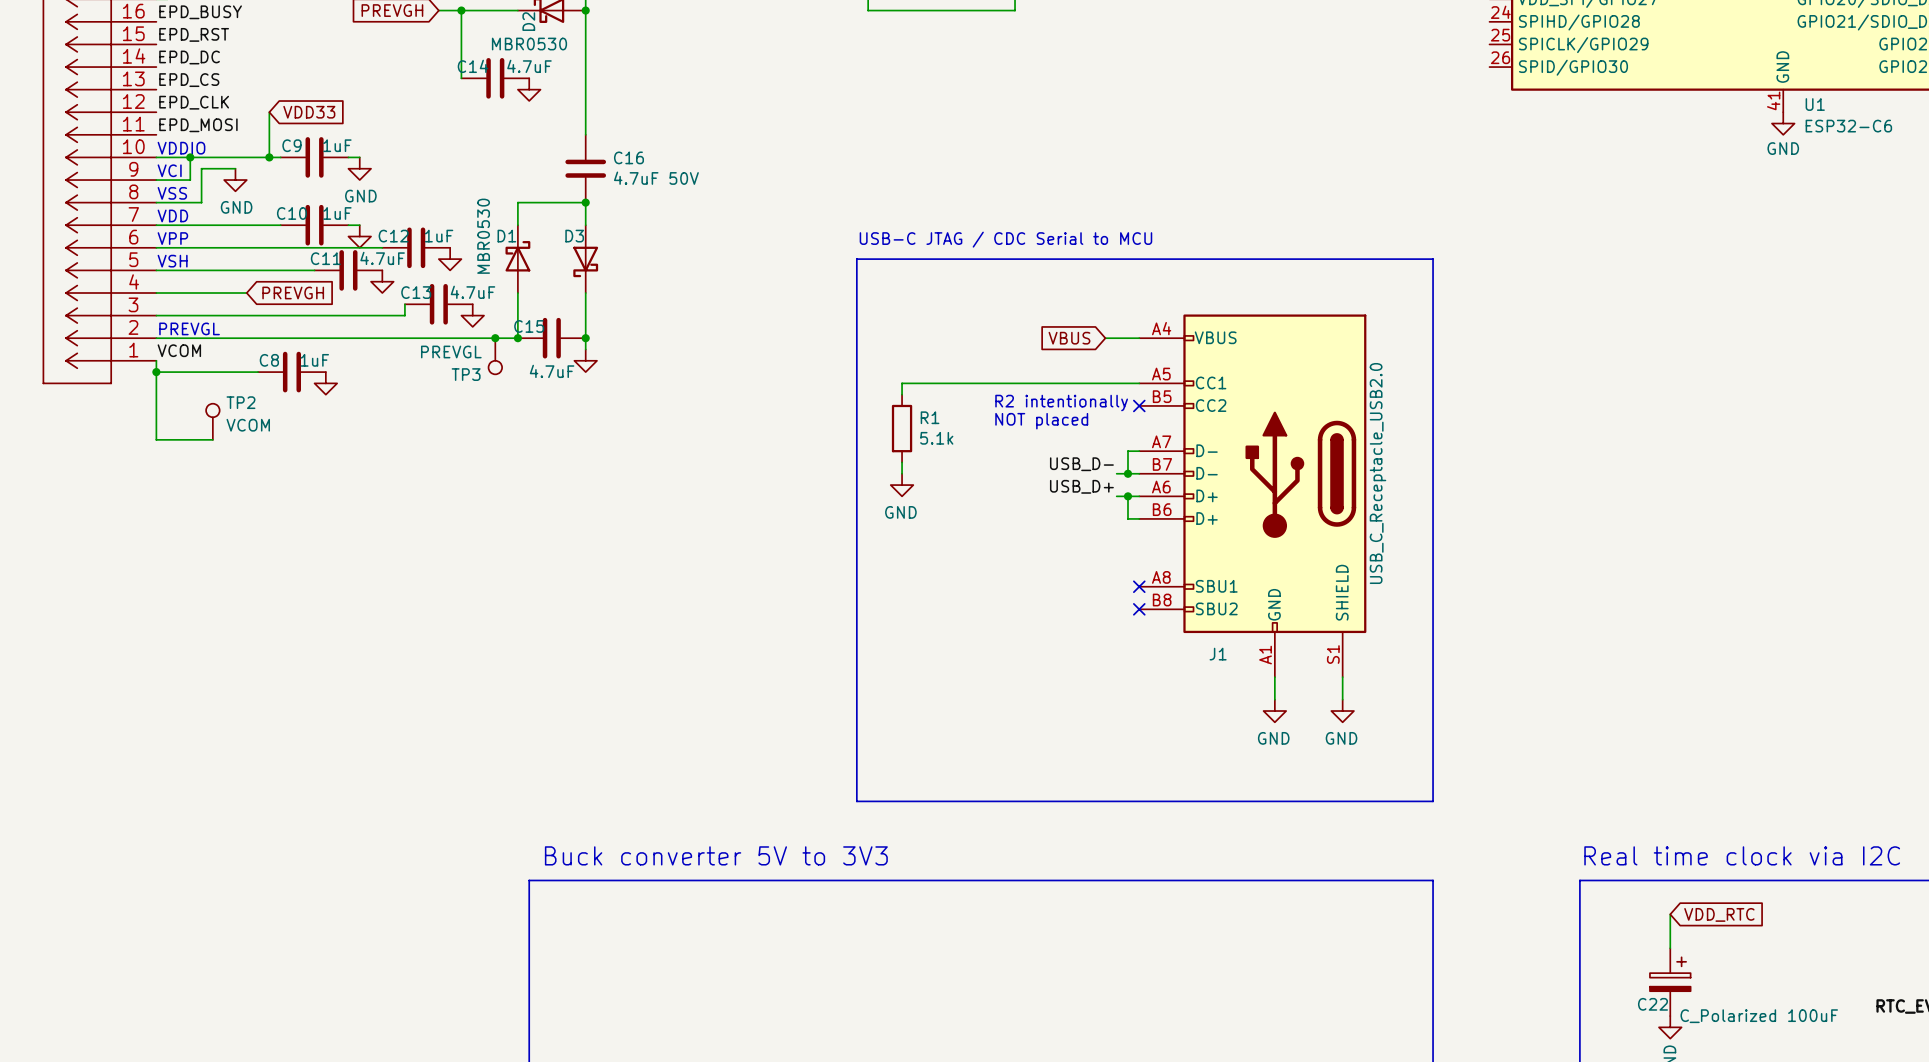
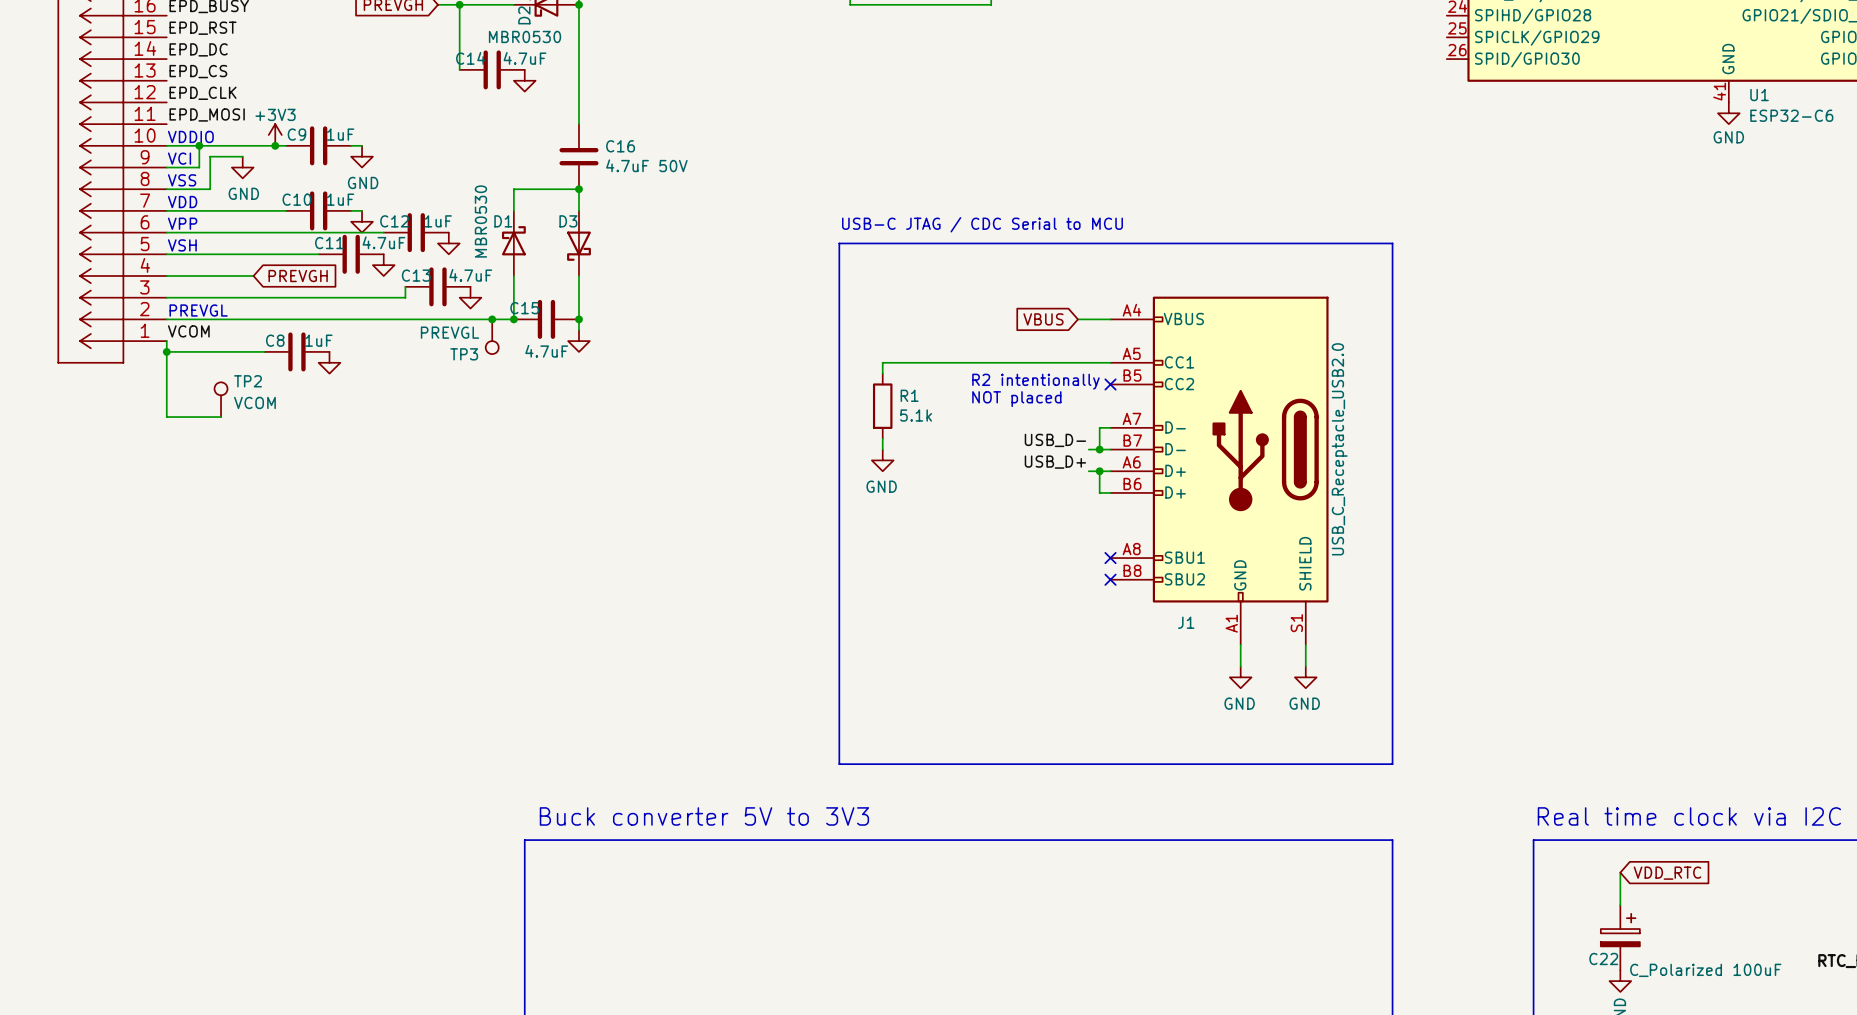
global label: VDD33 (309, 112) -> none
power symbol: none -> +3V3 (275, 134)

